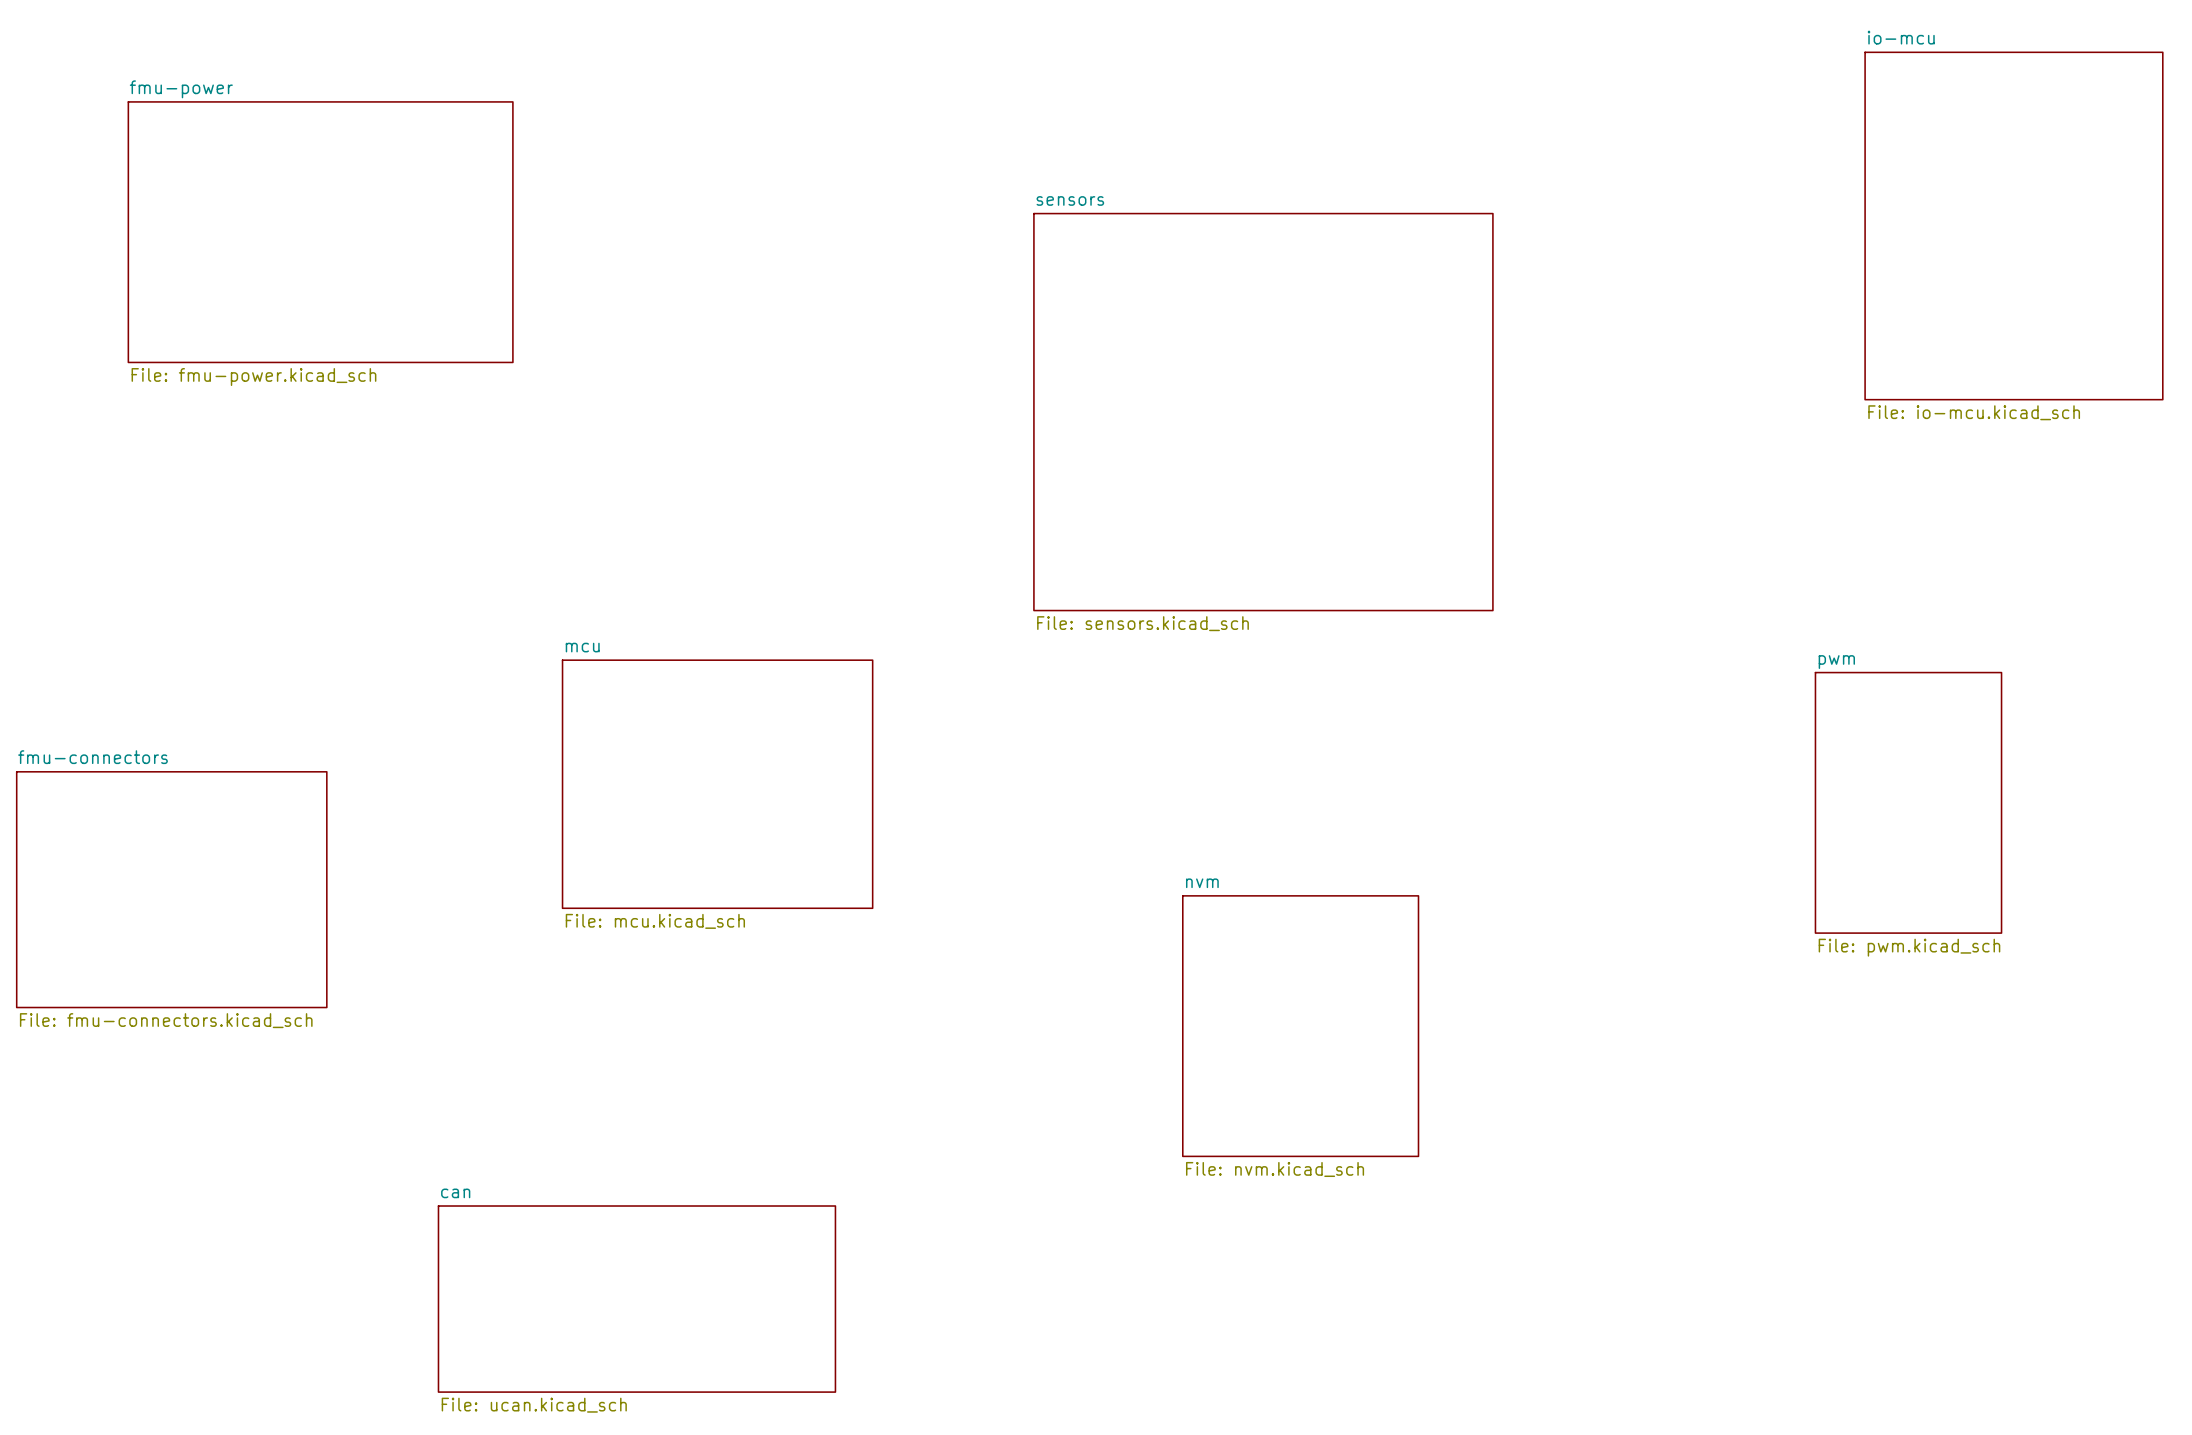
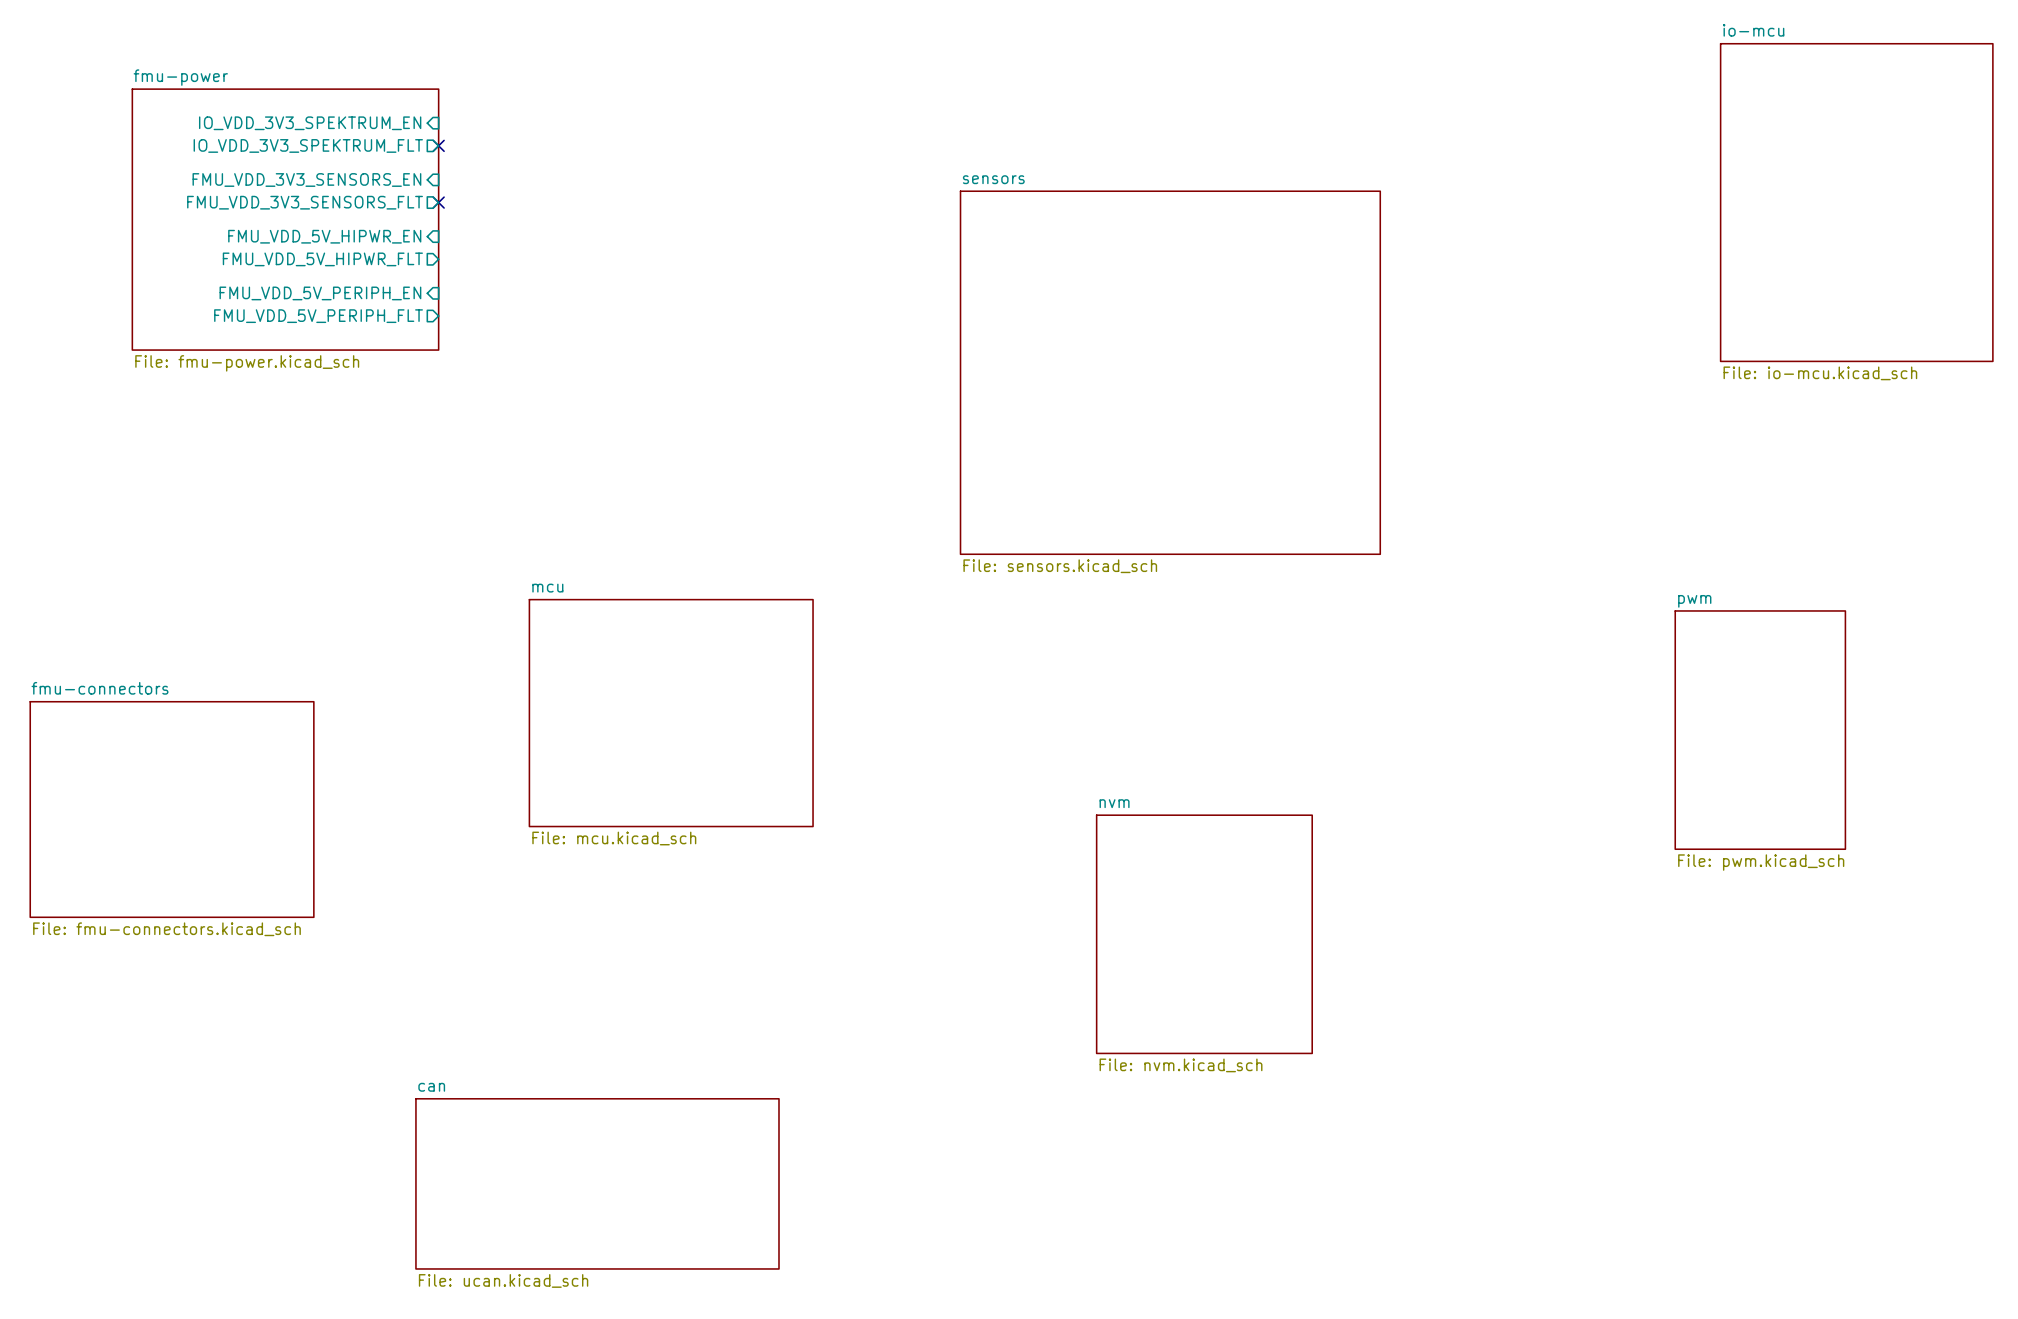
sheet pin: none -> IO_VDD_3V3_SPEKTRUM_EN (310, 123)
no-connect mark: none -> (438, 145)
sheet pin: none -> IO_VDD_3V3_SPEKTRUM_FLT (308, 145)
sheet pin: none -> FMU_VDD_3V3_SENSORS_EN (306, 179)
no-connect mark: none -> (438, 202)
sheet pin: none -> FMU_VDD_3V3_SENSORS_FLT (305, 202)
sheet fmu-power: File: fmu-power.kicad_sch (320, 232) -> none
sheet fmu-power: none -> File: fmu-power.kicad_sch (285, 219)
sheet pin: none -> FMU_VDD_5V_HIPWR_EN (324, 236)
sheet pin: none -> FMU_VDD_5V_HIPWR_FLT (322, 259)
sheet pin: none -> FMU_VDD_5V_PERIPH_EN (320, 293)
sheet pin: none -> FMU_VDD_5V_PERIPH_FLT (318, 316)

